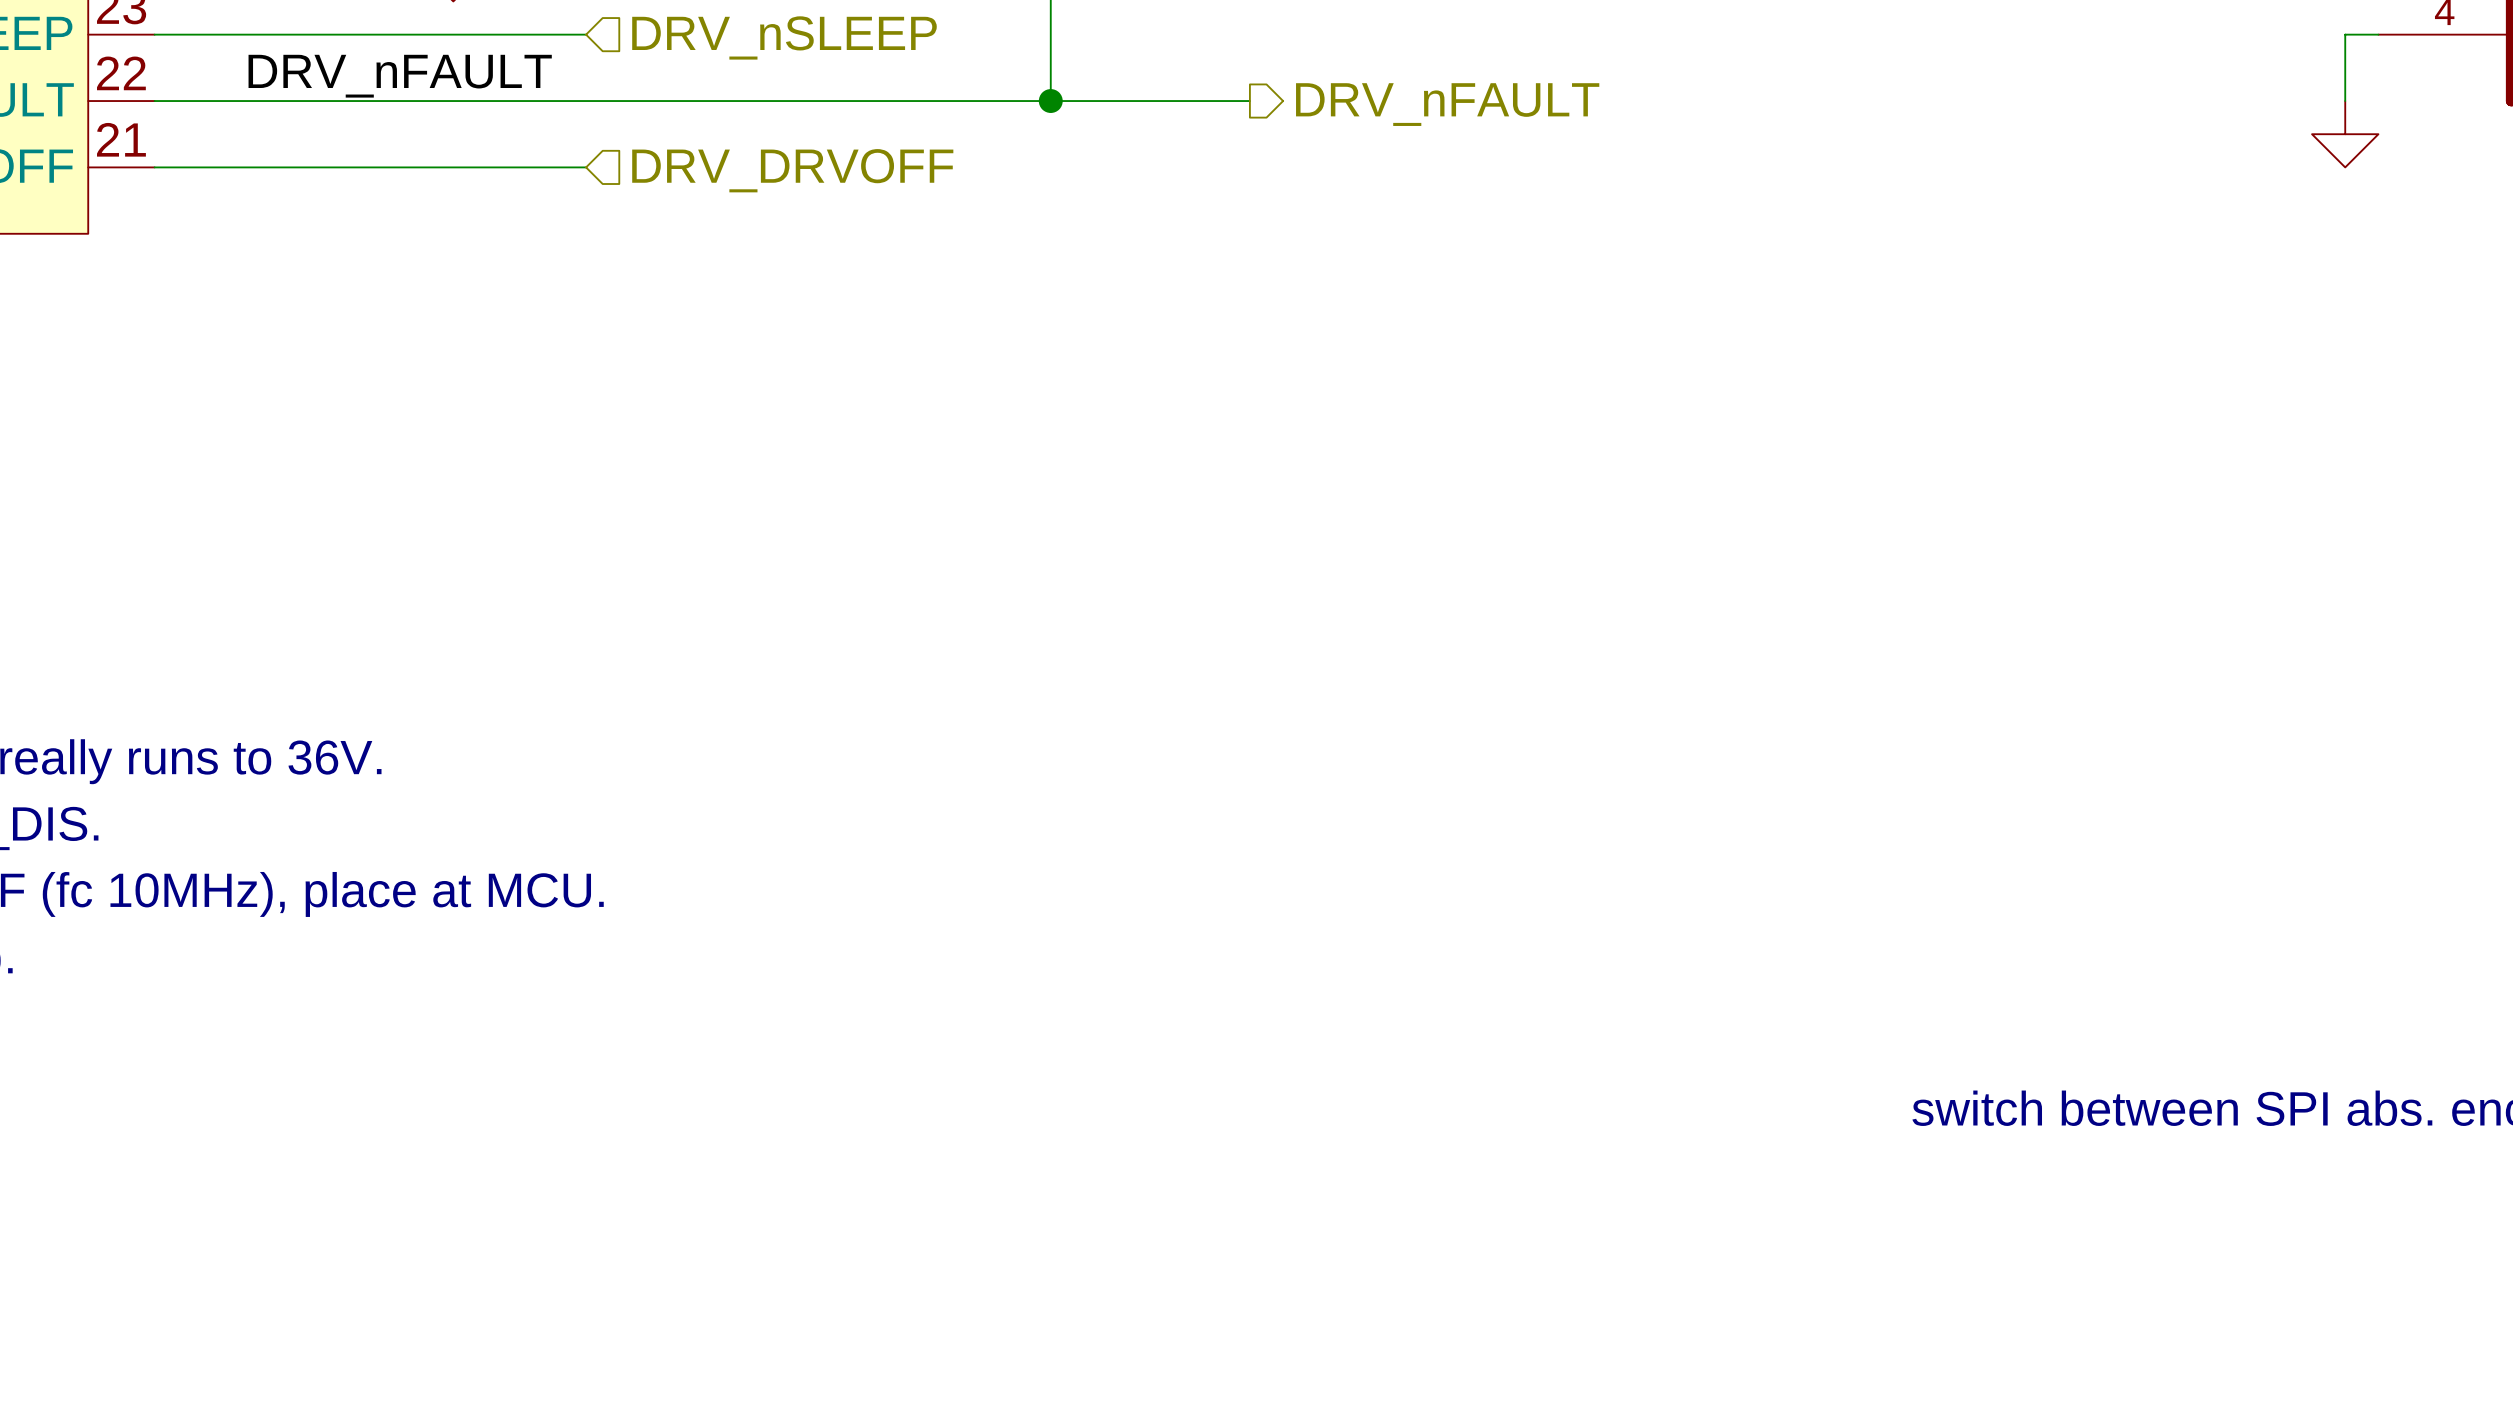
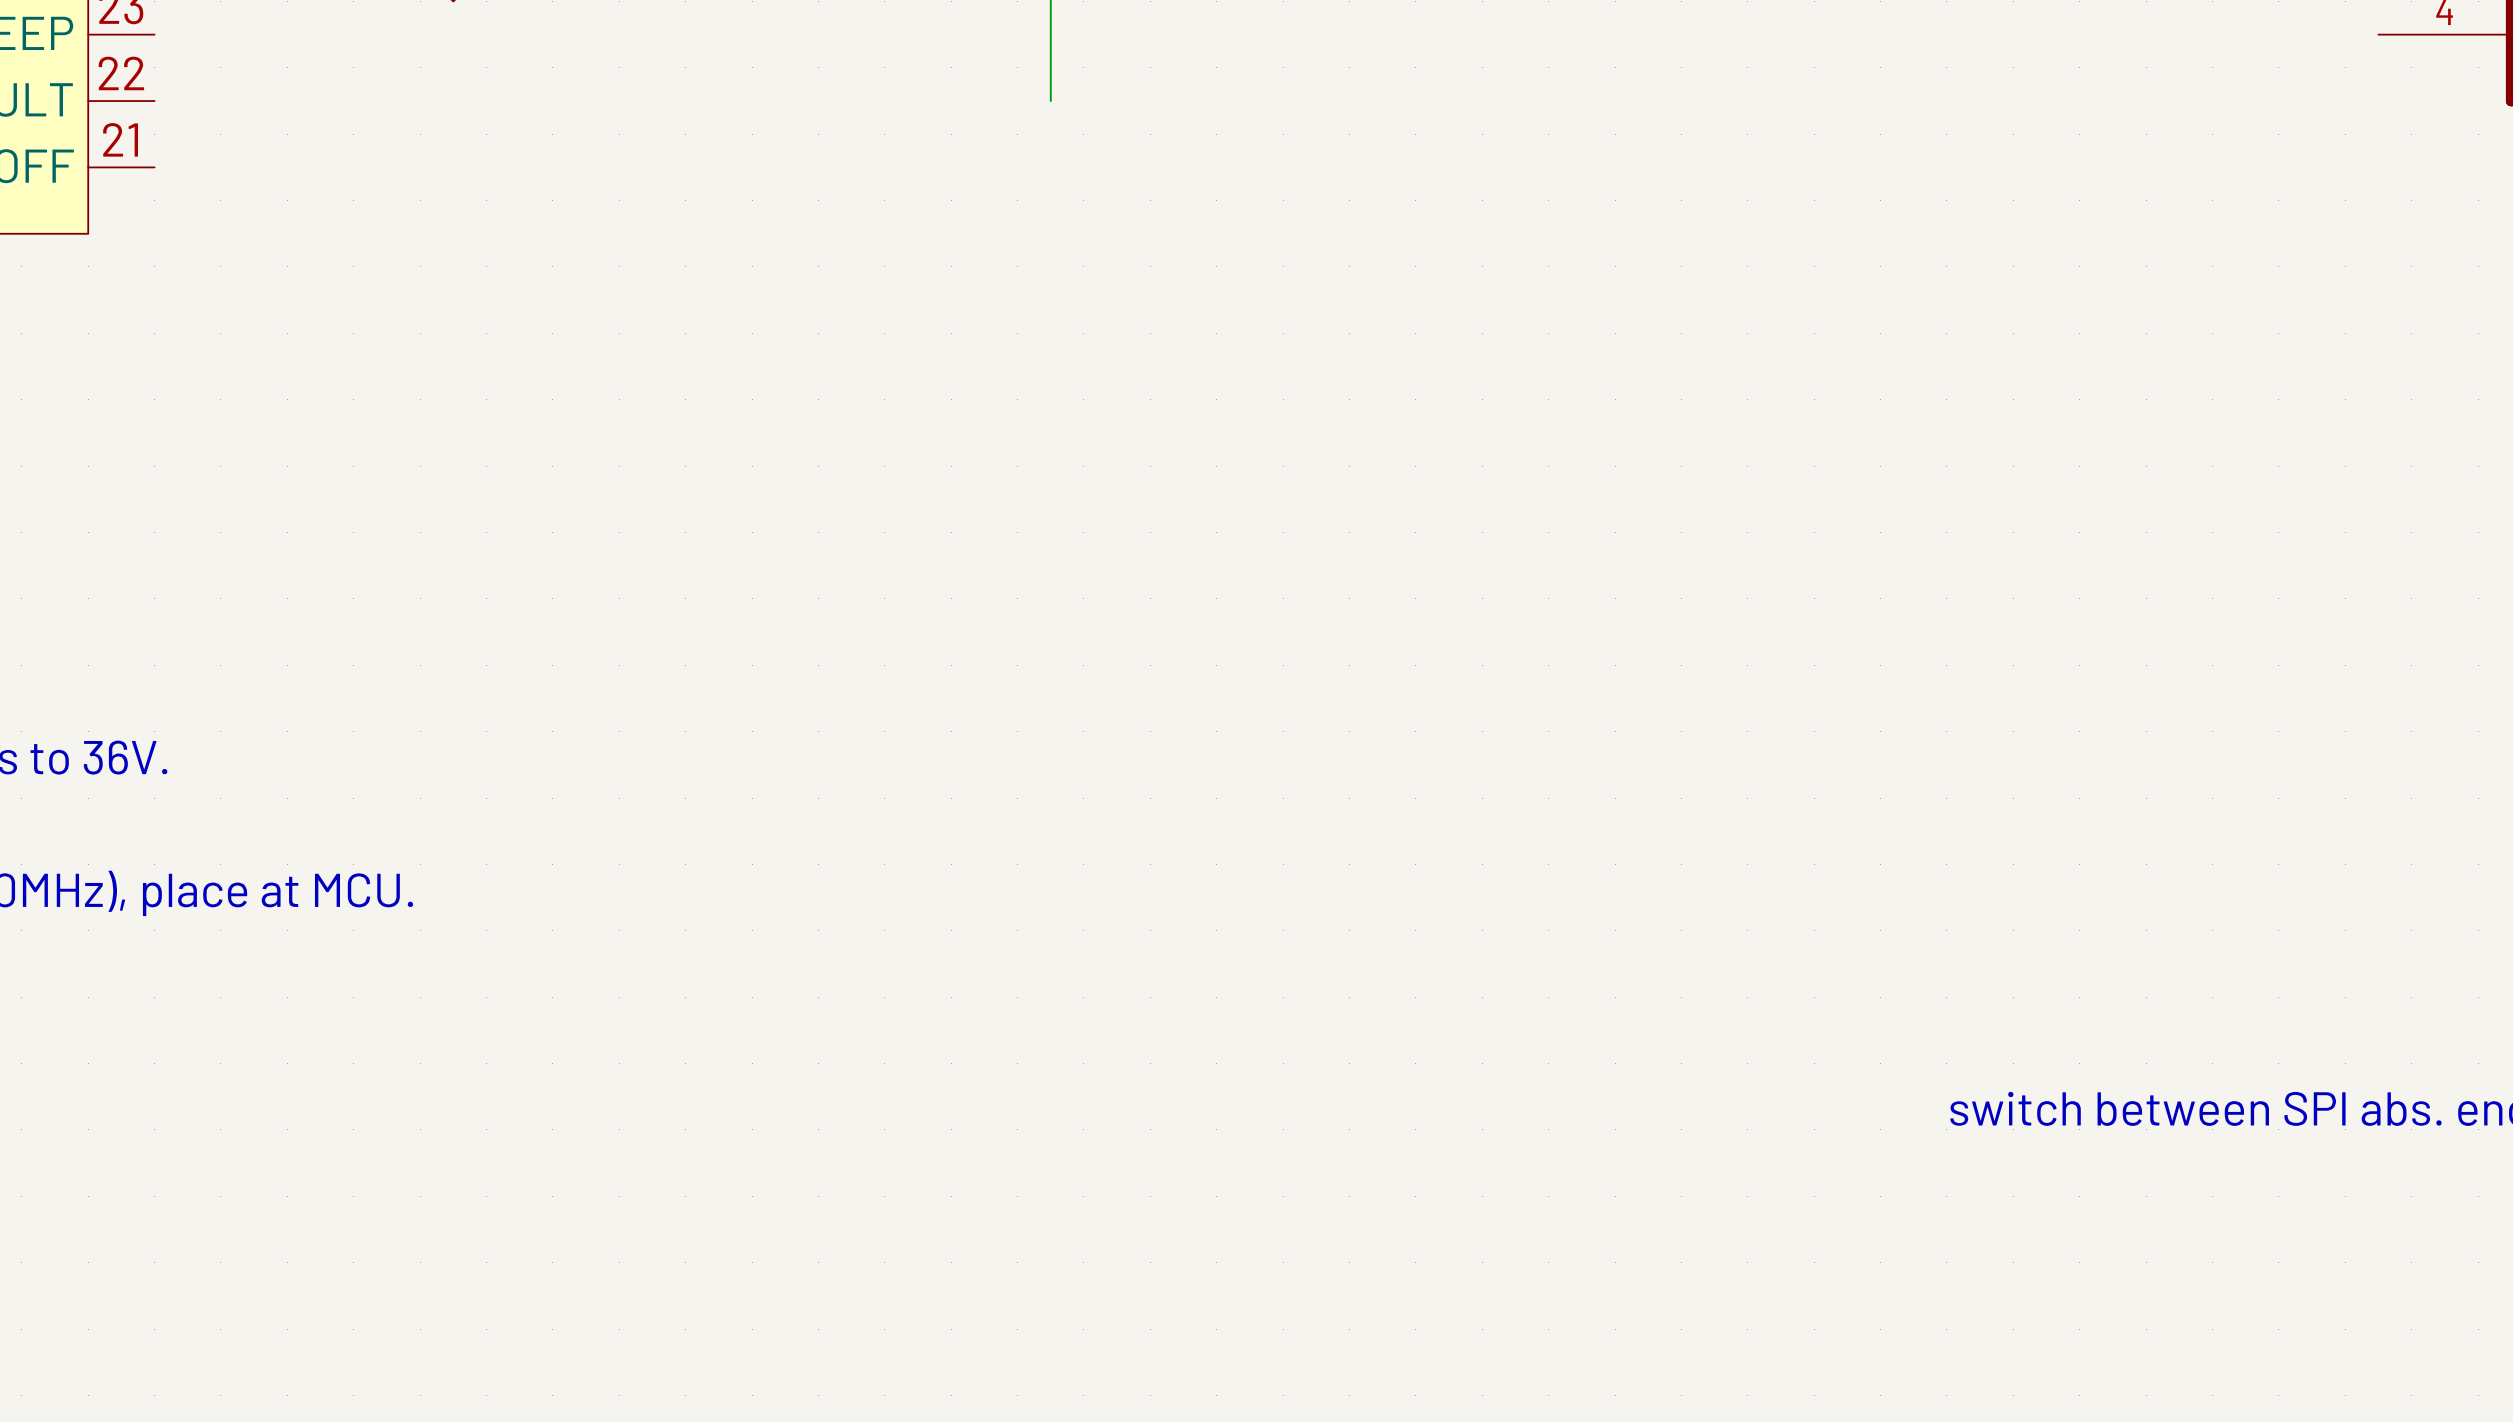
wire: (154, 34) (586, 34) -> none
wire: (2378, 34) (2345, 34) (2345, 101) -> none
hierarchical label: DRV_nSLEEP (784, 37) -> none
label: DRV_nFAULT (400, 76) -> none
wire: (154, 101) (1249, 101) -> none
junction: (1050, 101) -> none
hierarchical label: DRV_nFAULT (1447, 104) -> none
power symbol: (2345, 134) -> none
wire: (154, 167) (586, 167) -> none
hierarchical label: DRV_DRVOFF (792, 170) -> none

